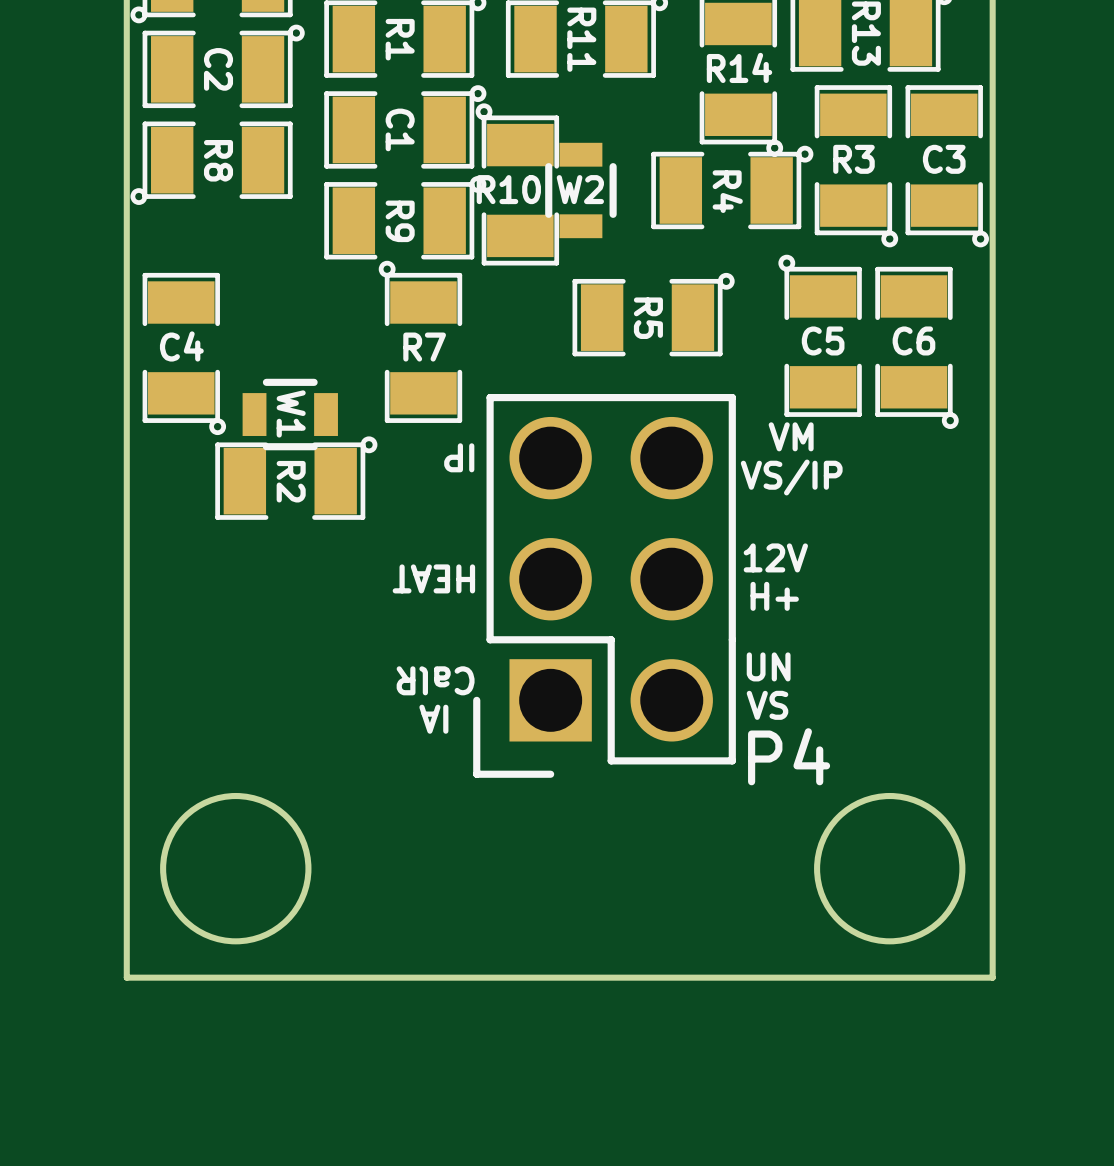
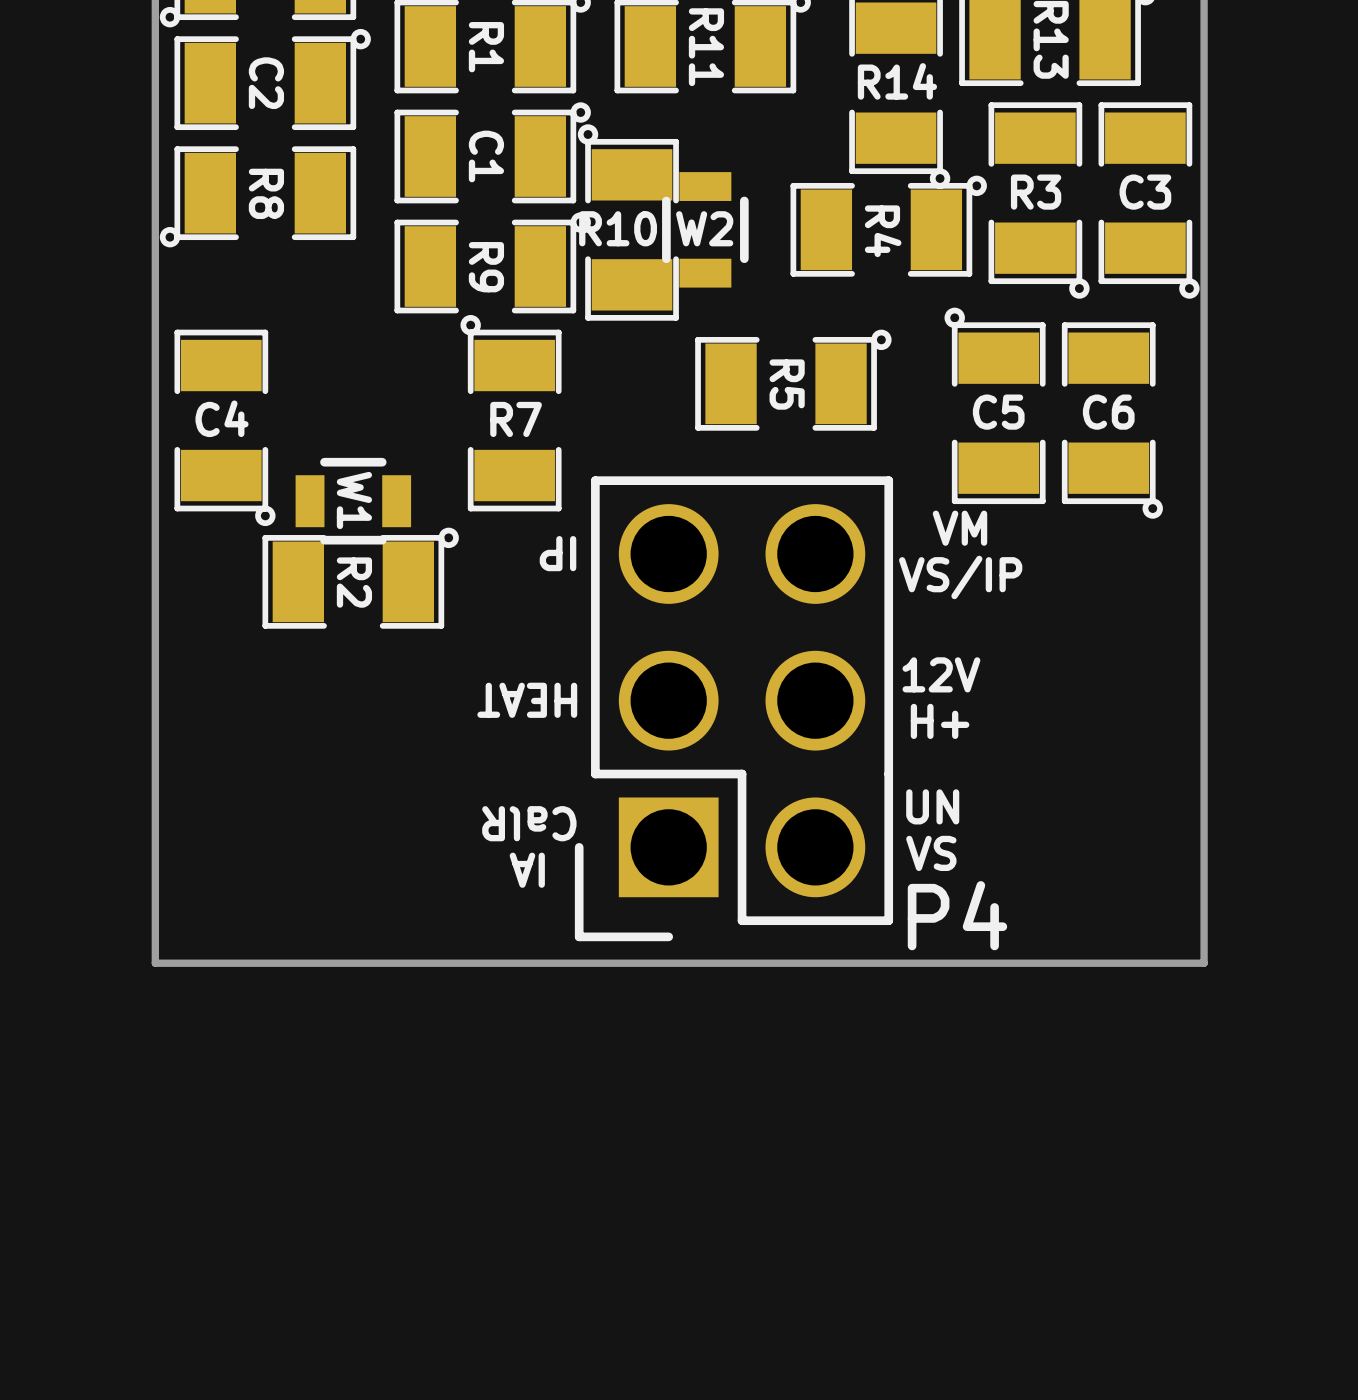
round board edge: [160, 792, 312, 945] -> none
round board edge: [814, 792, 966, 945] -> none
board edge: (992, 796) (992, 977) (126, 977) (126, 796) -> (1204, 963) (155, 963)

